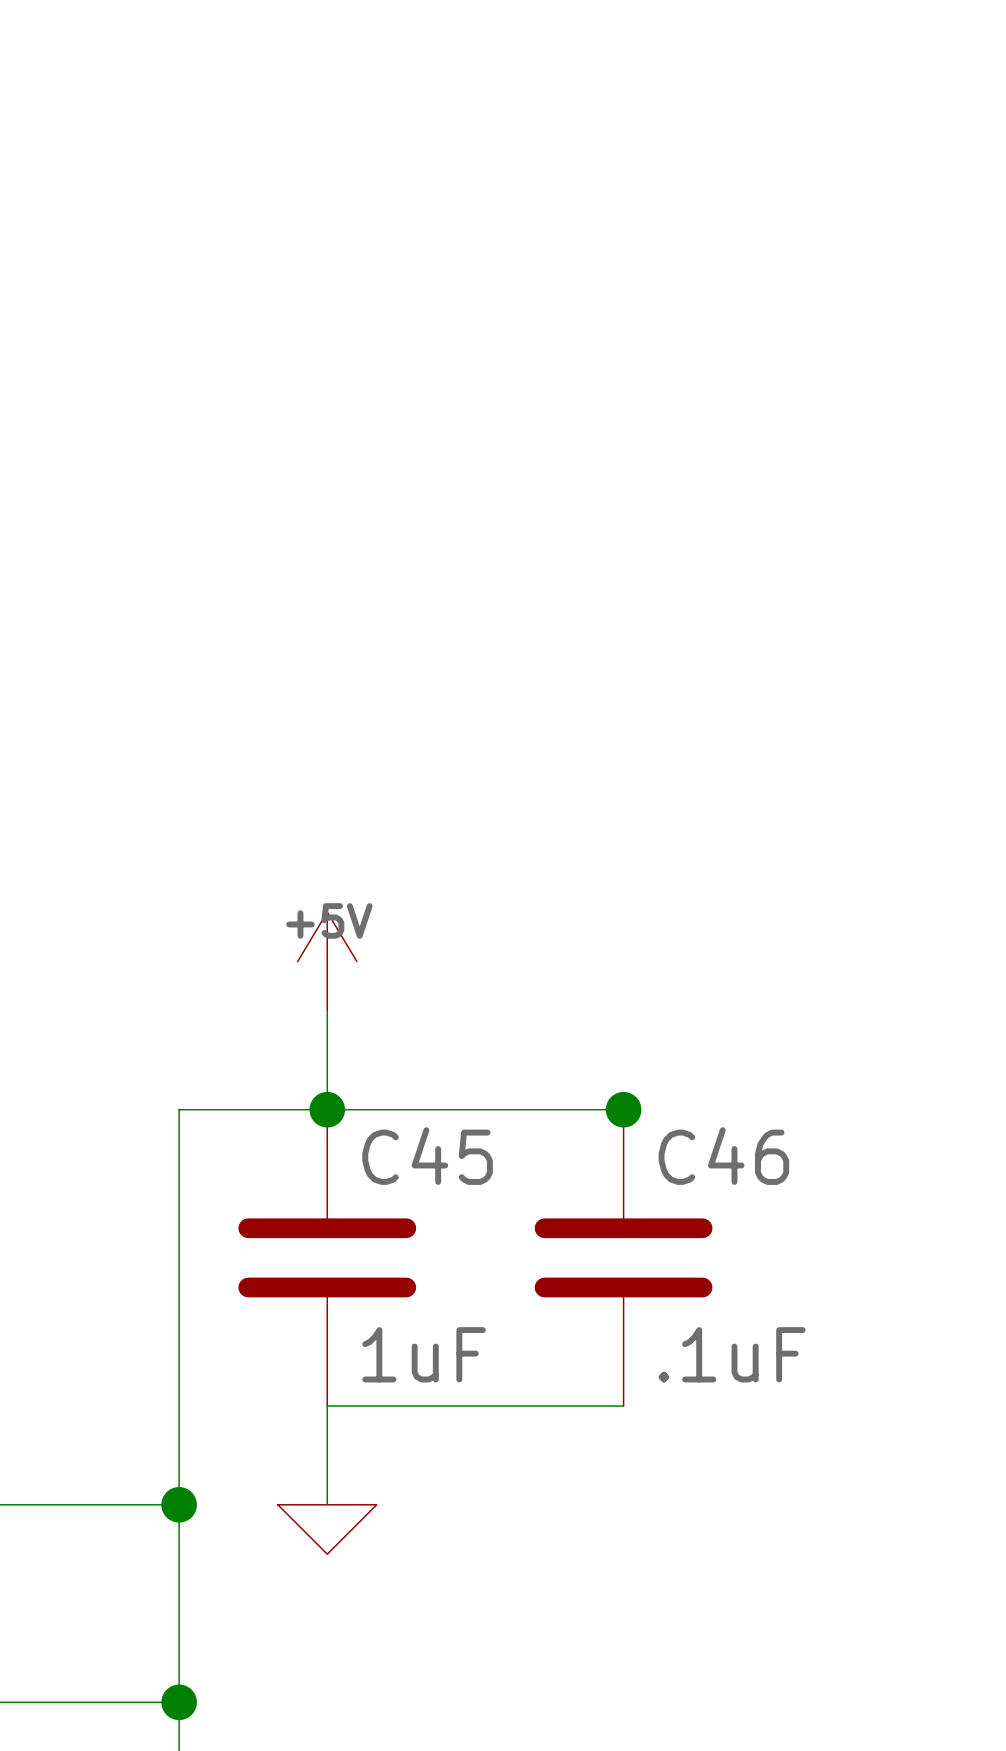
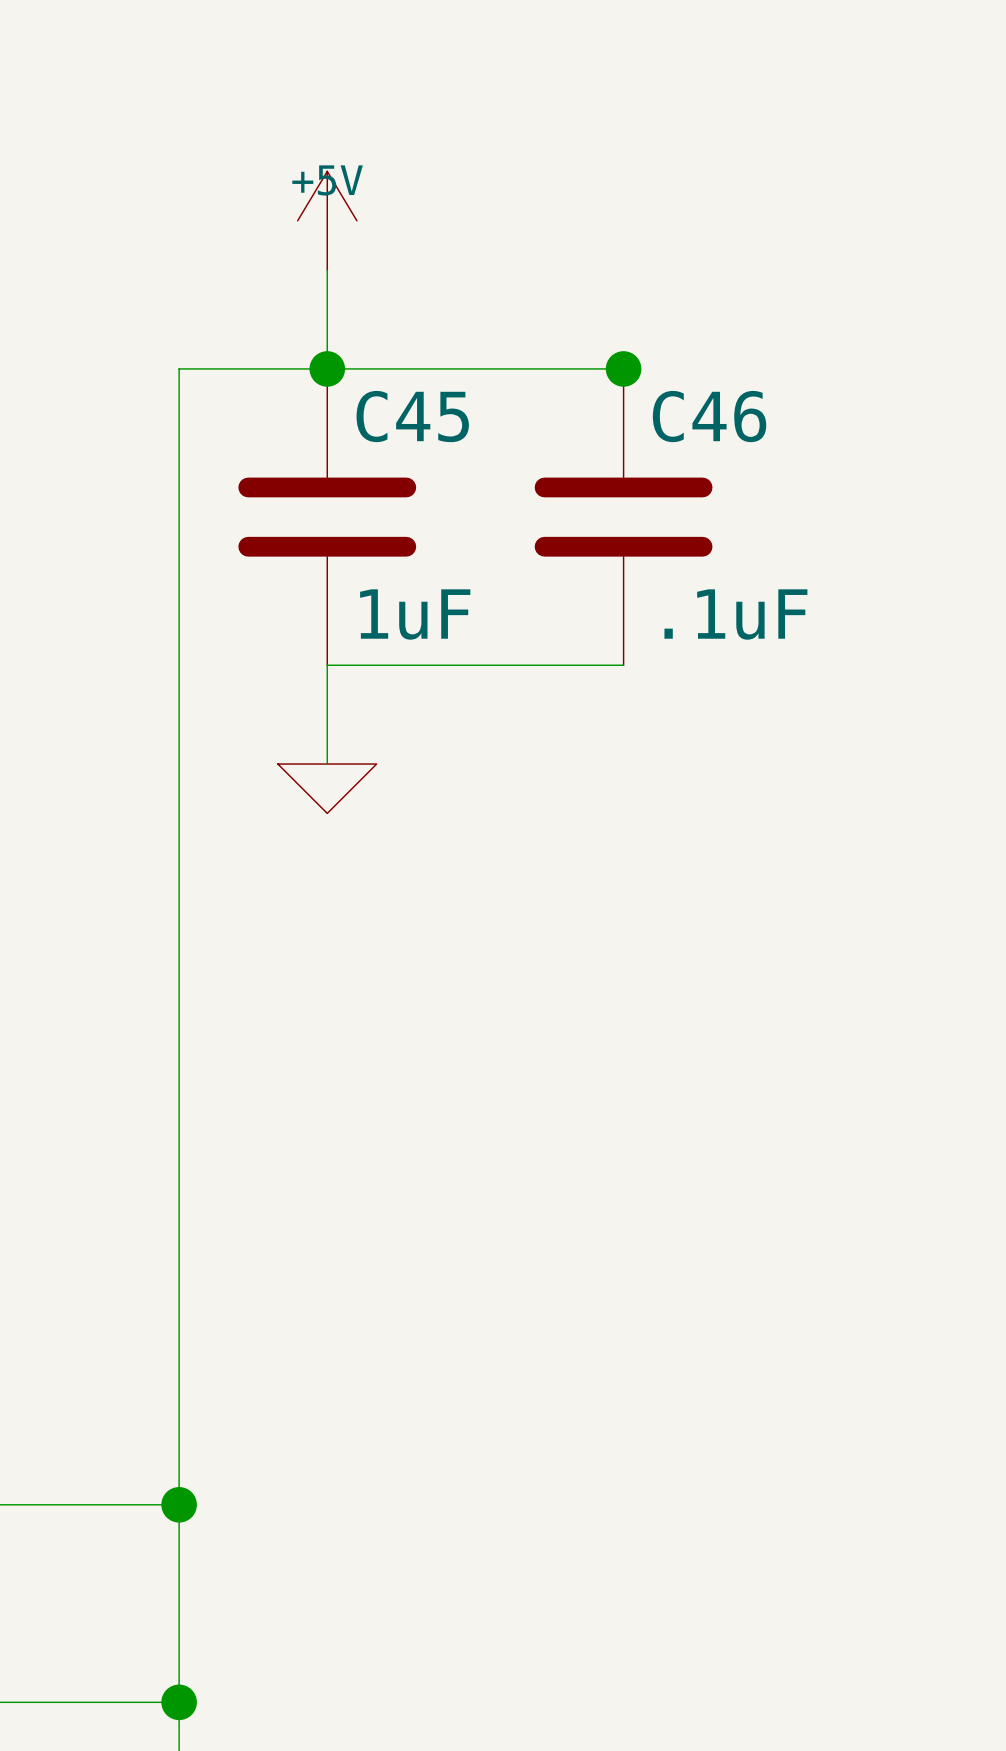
junction: none -> (327, 368)
junction: none -> (623, 368)
power symbol position: +5V (327, 961) -> +5V (327, 220)
wire: (327, 1010) (327, 1109) -> (327, 270) (327, 368)
wire: (179, 1109) (623, 1109) -> (179, 1109) (179, 368) (623, 368)
junction: (327, 1109) -> none
junction: (623, 1109) -> none
C45 position: (327, 1257) -> (327, 517)
C46 position: (623, 1257) -> (623, 517)
wire: (623, 1406) (327, 1406) (327, 1504) -> (623, 665) (327, 665) (327, 764)
power symbol position: (327, 1529) -> (327, 788)

